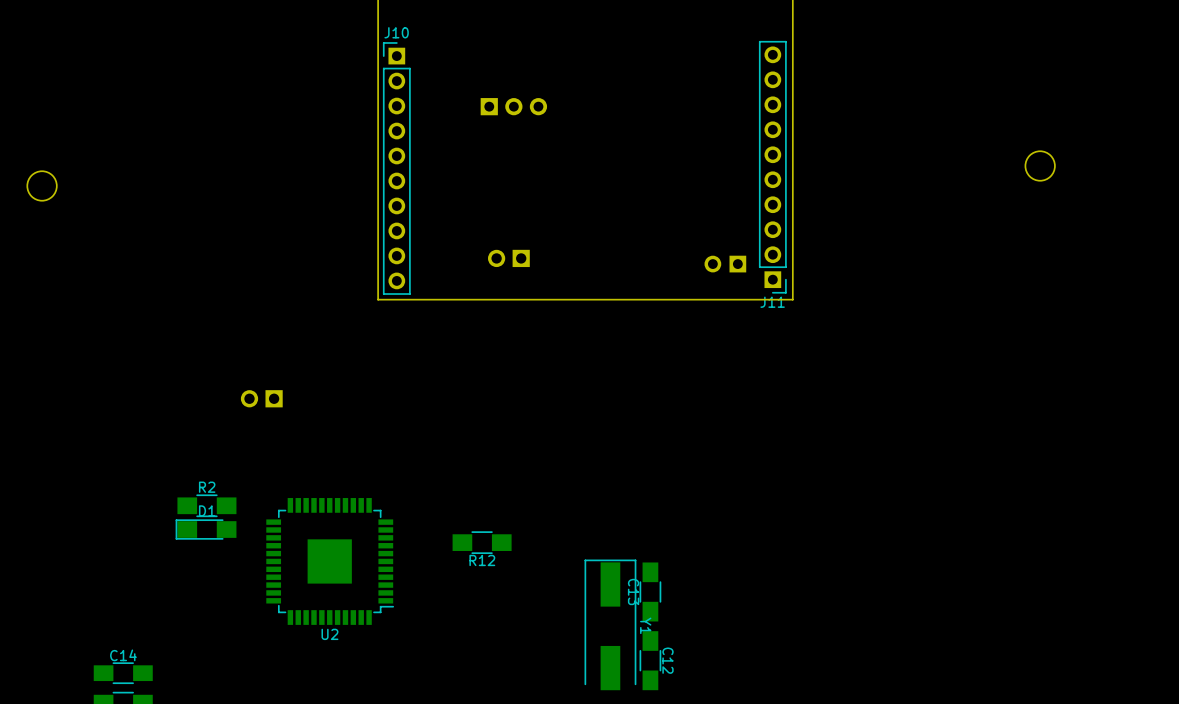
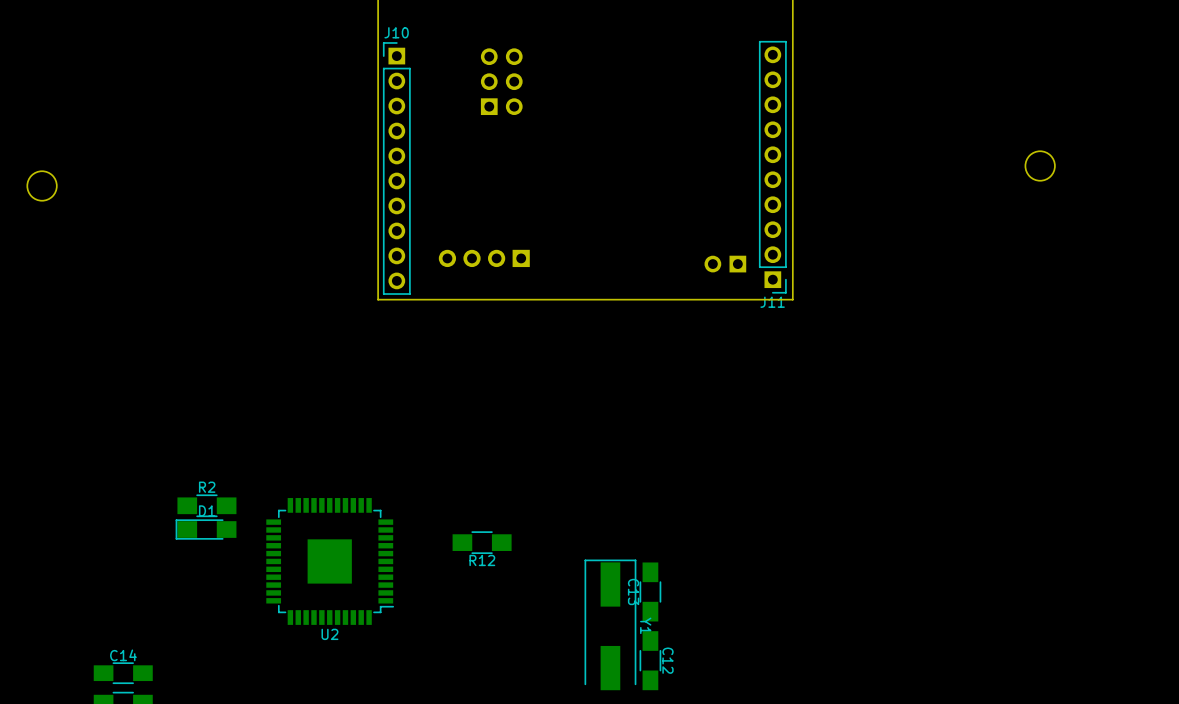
part: none -> (501, 81)
part: (513, 106) -> none
part: none -> (484, 258)
part: (508, 258) -> none
part: (261, 398) -> none

